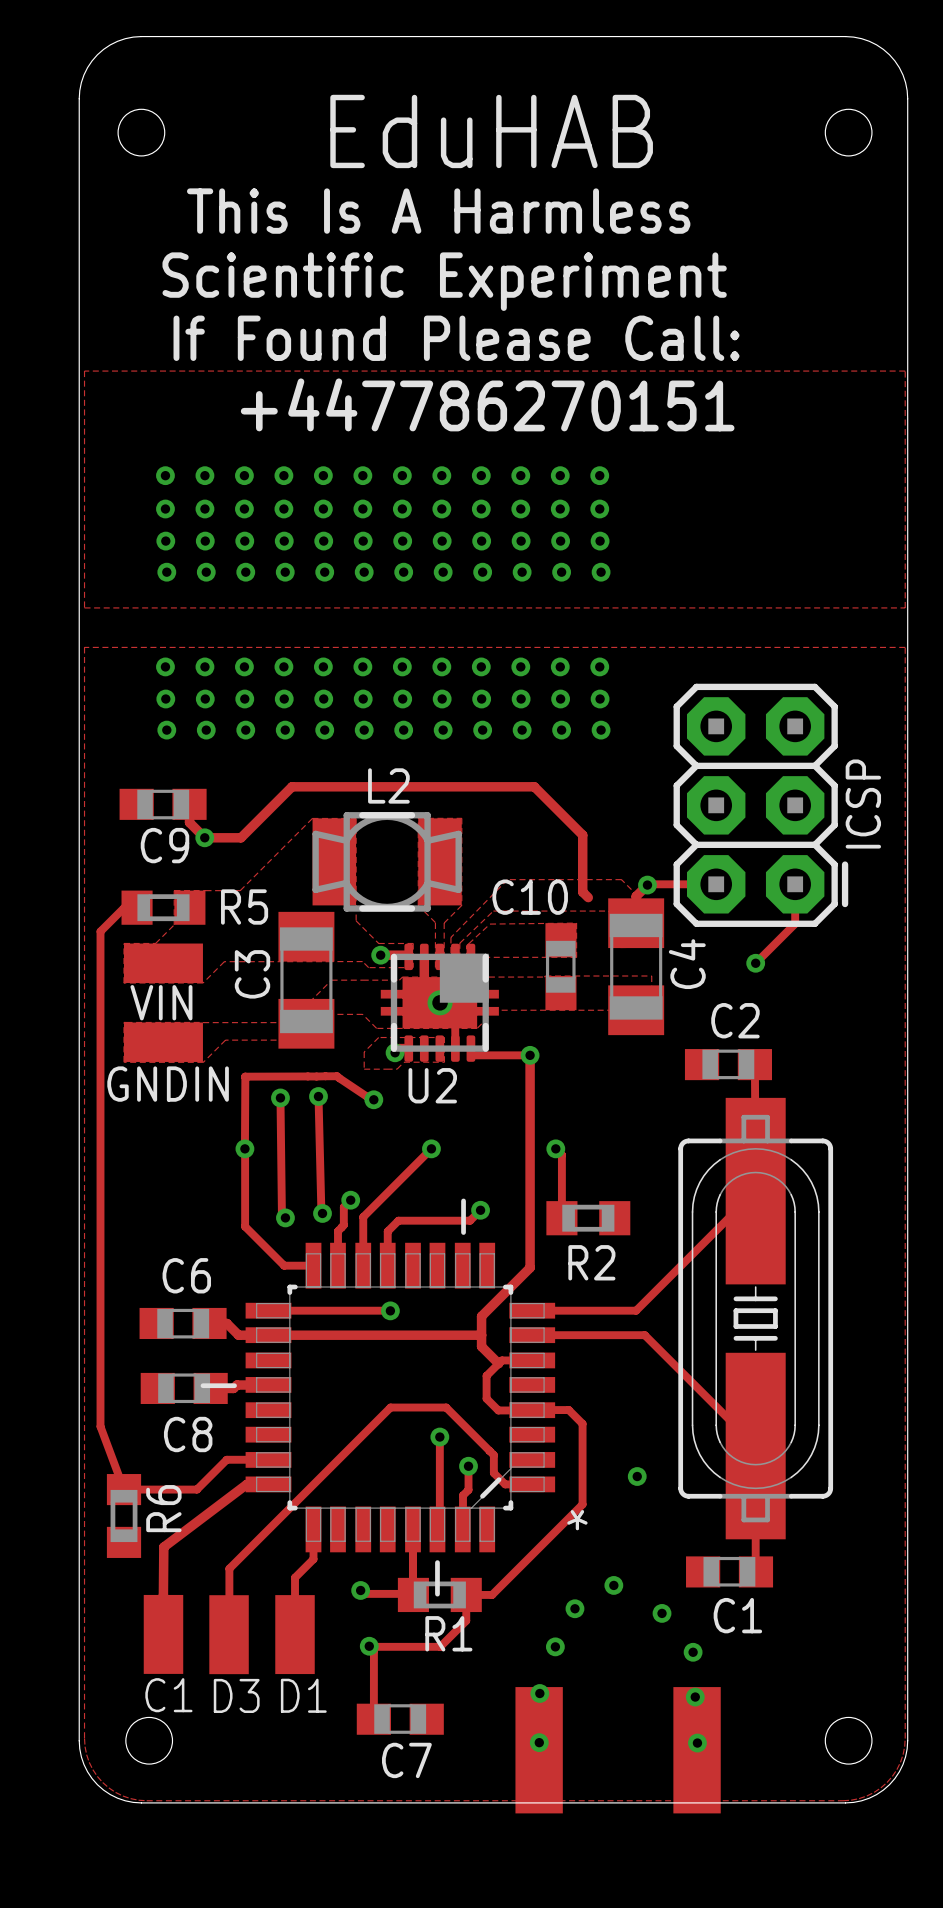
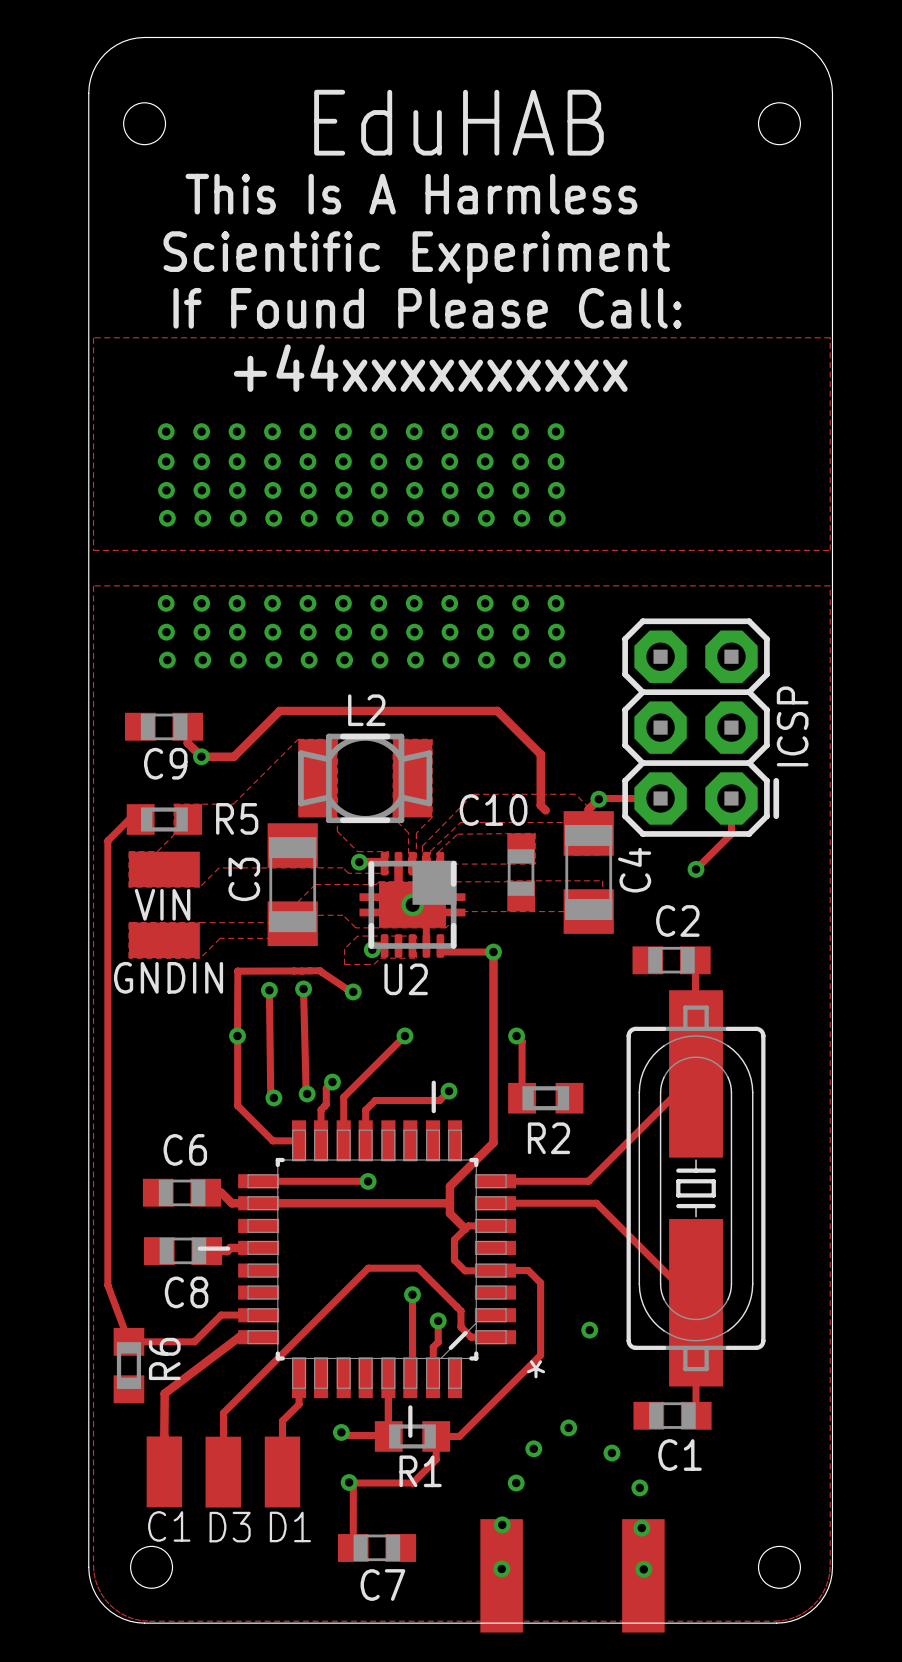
text: +447786270151 (487, 404) -> +44xxxxxxxxxx (430, 368)

